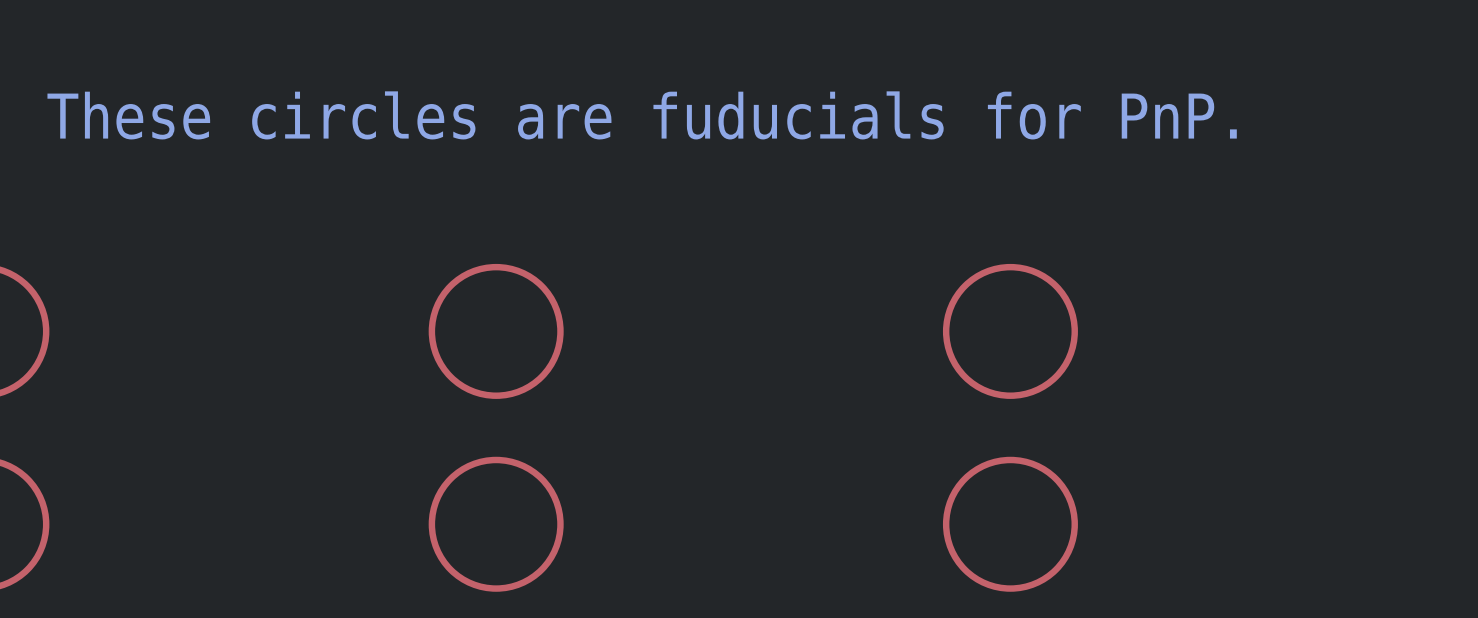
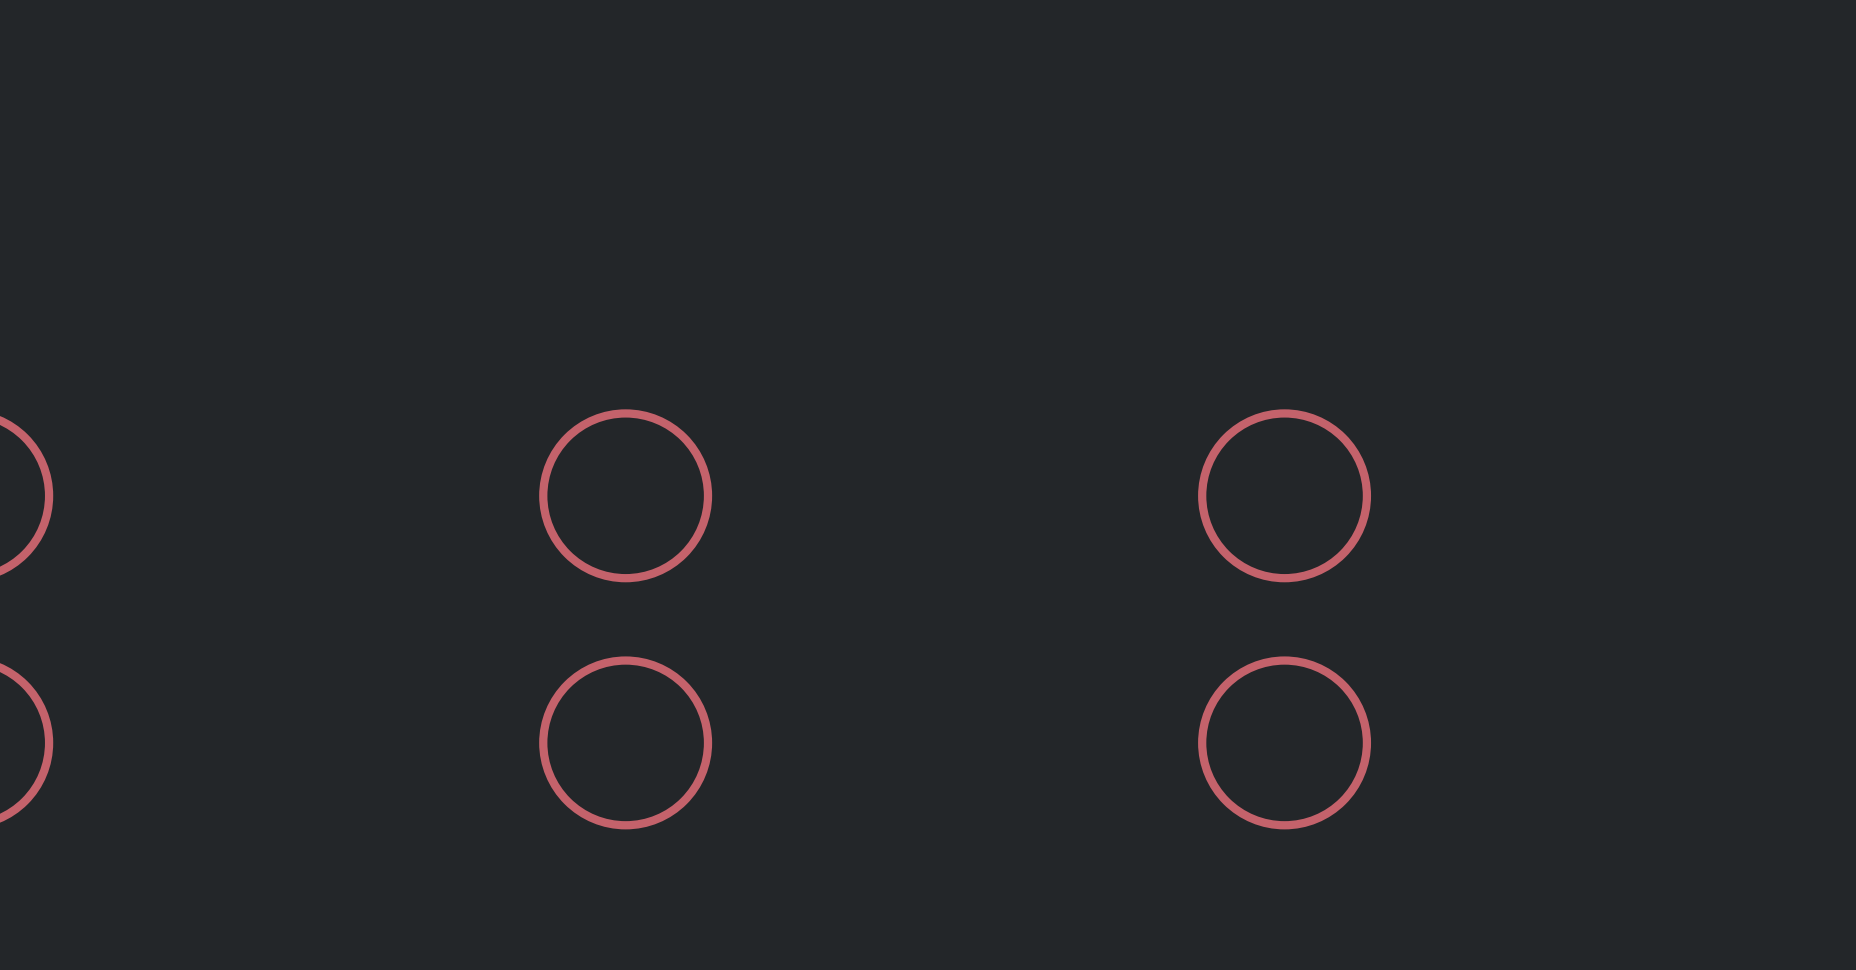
text: These circles are fuducials for PnP. (642, 115) -> none

